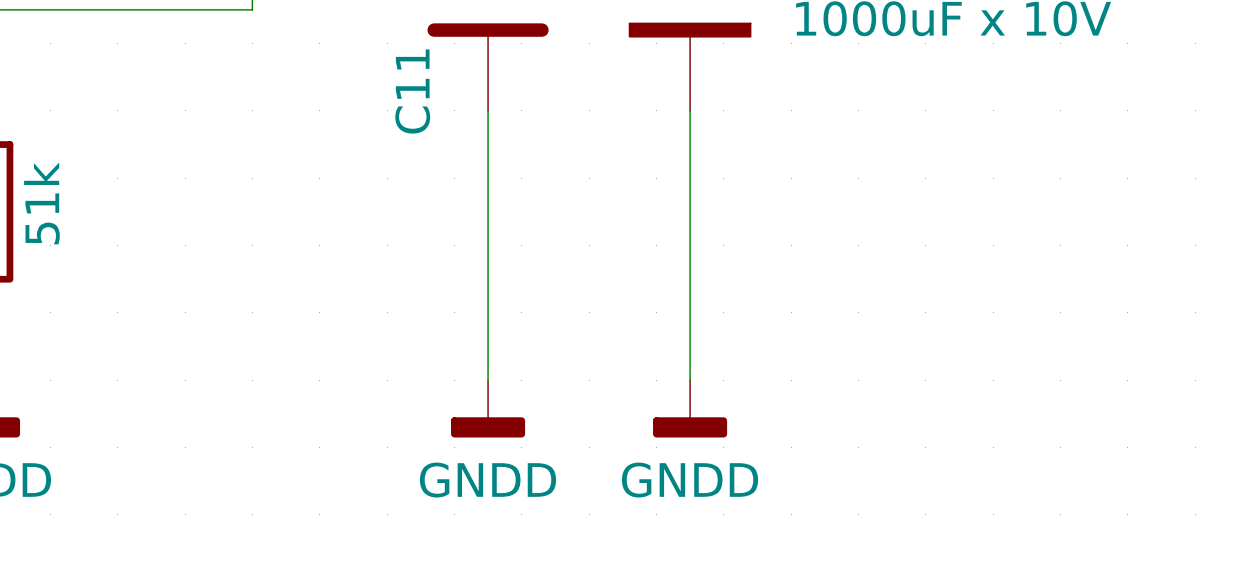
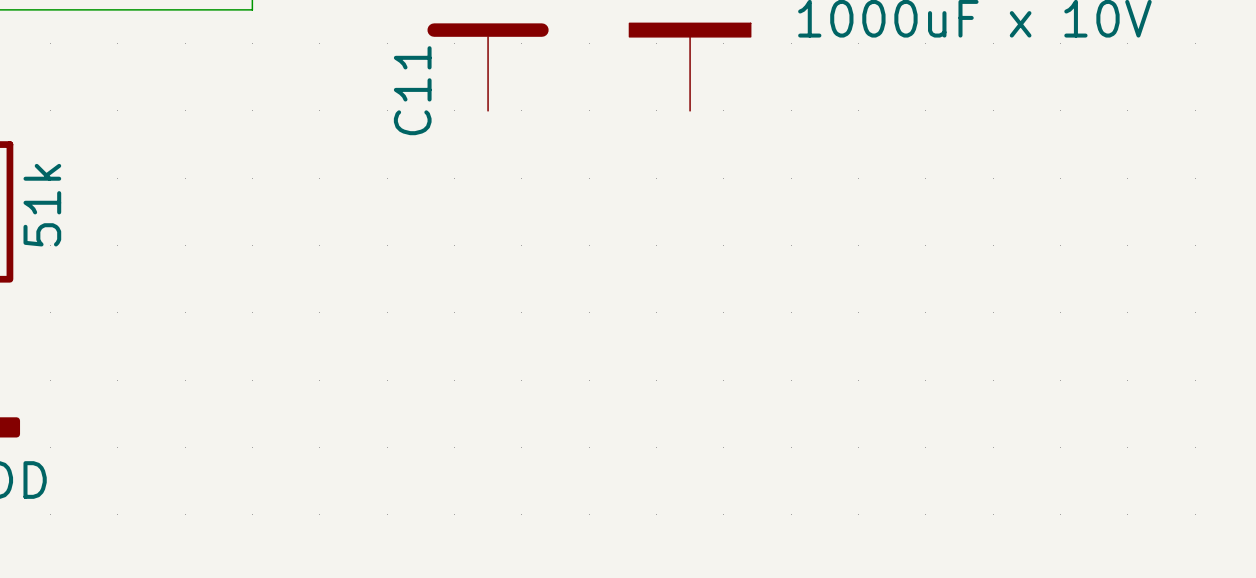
wire: (488, 110) (488, 380) -> none
wire: (690, 110) (690, 380) -> none
power symbol: GNDD (488, 408) -> none
power symbol: GNDD (690, 408) -> none

